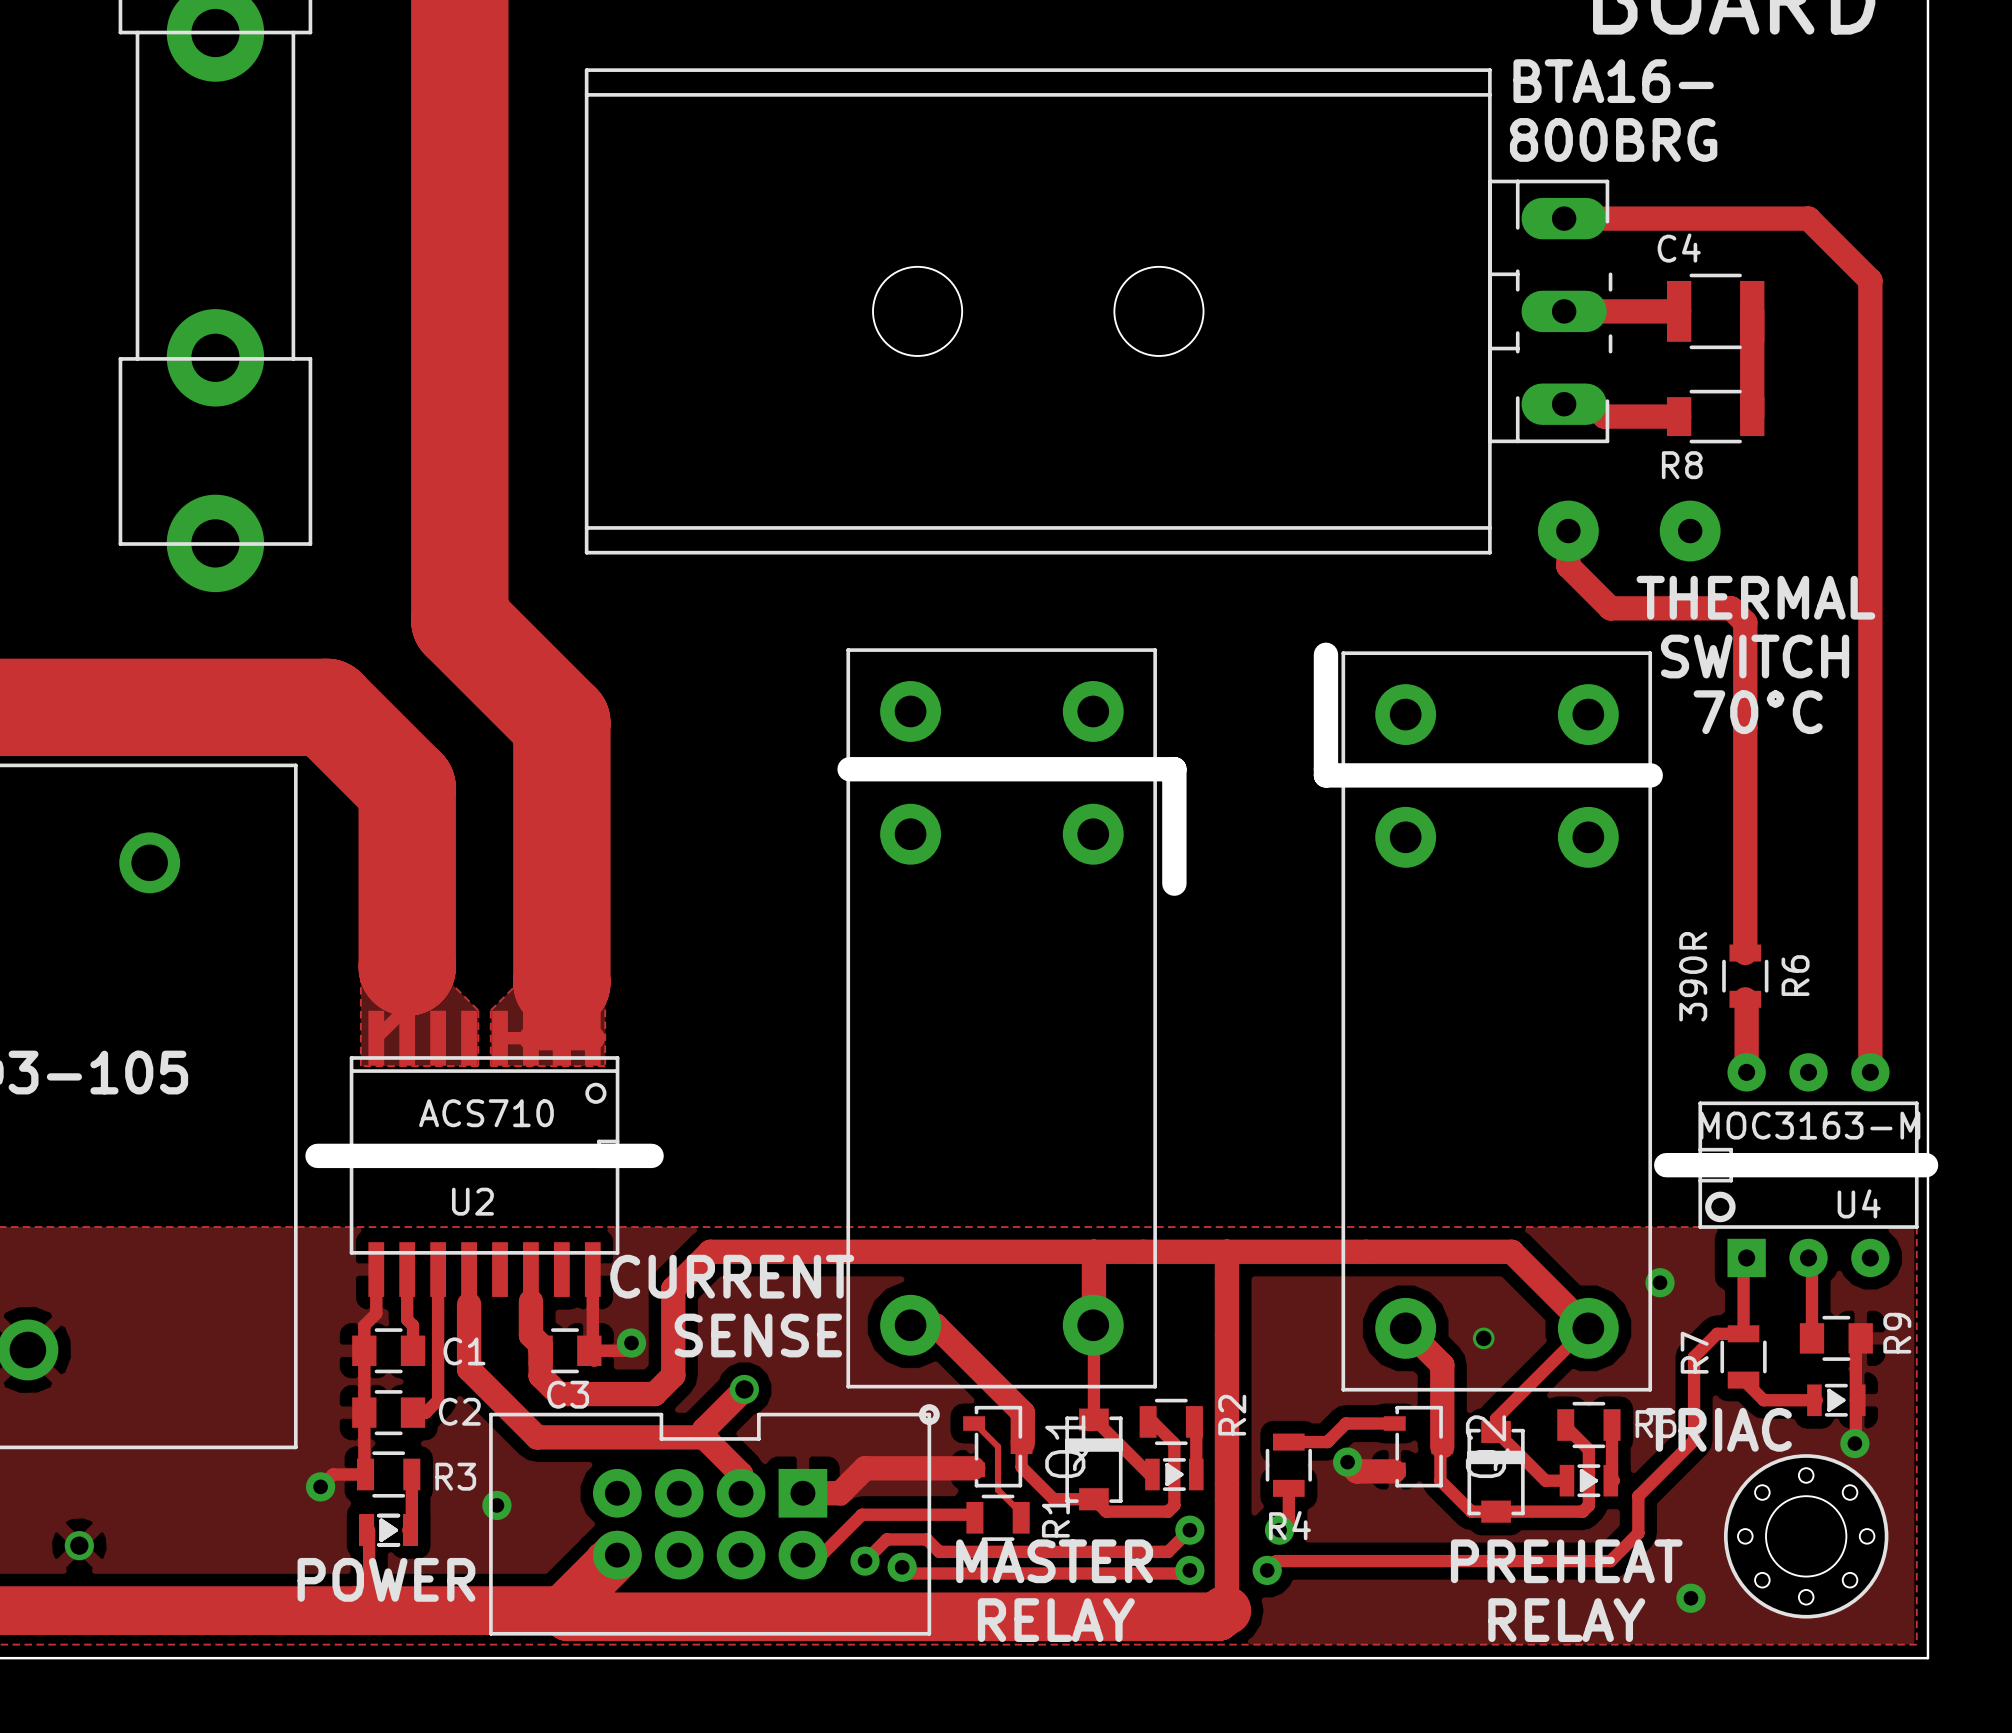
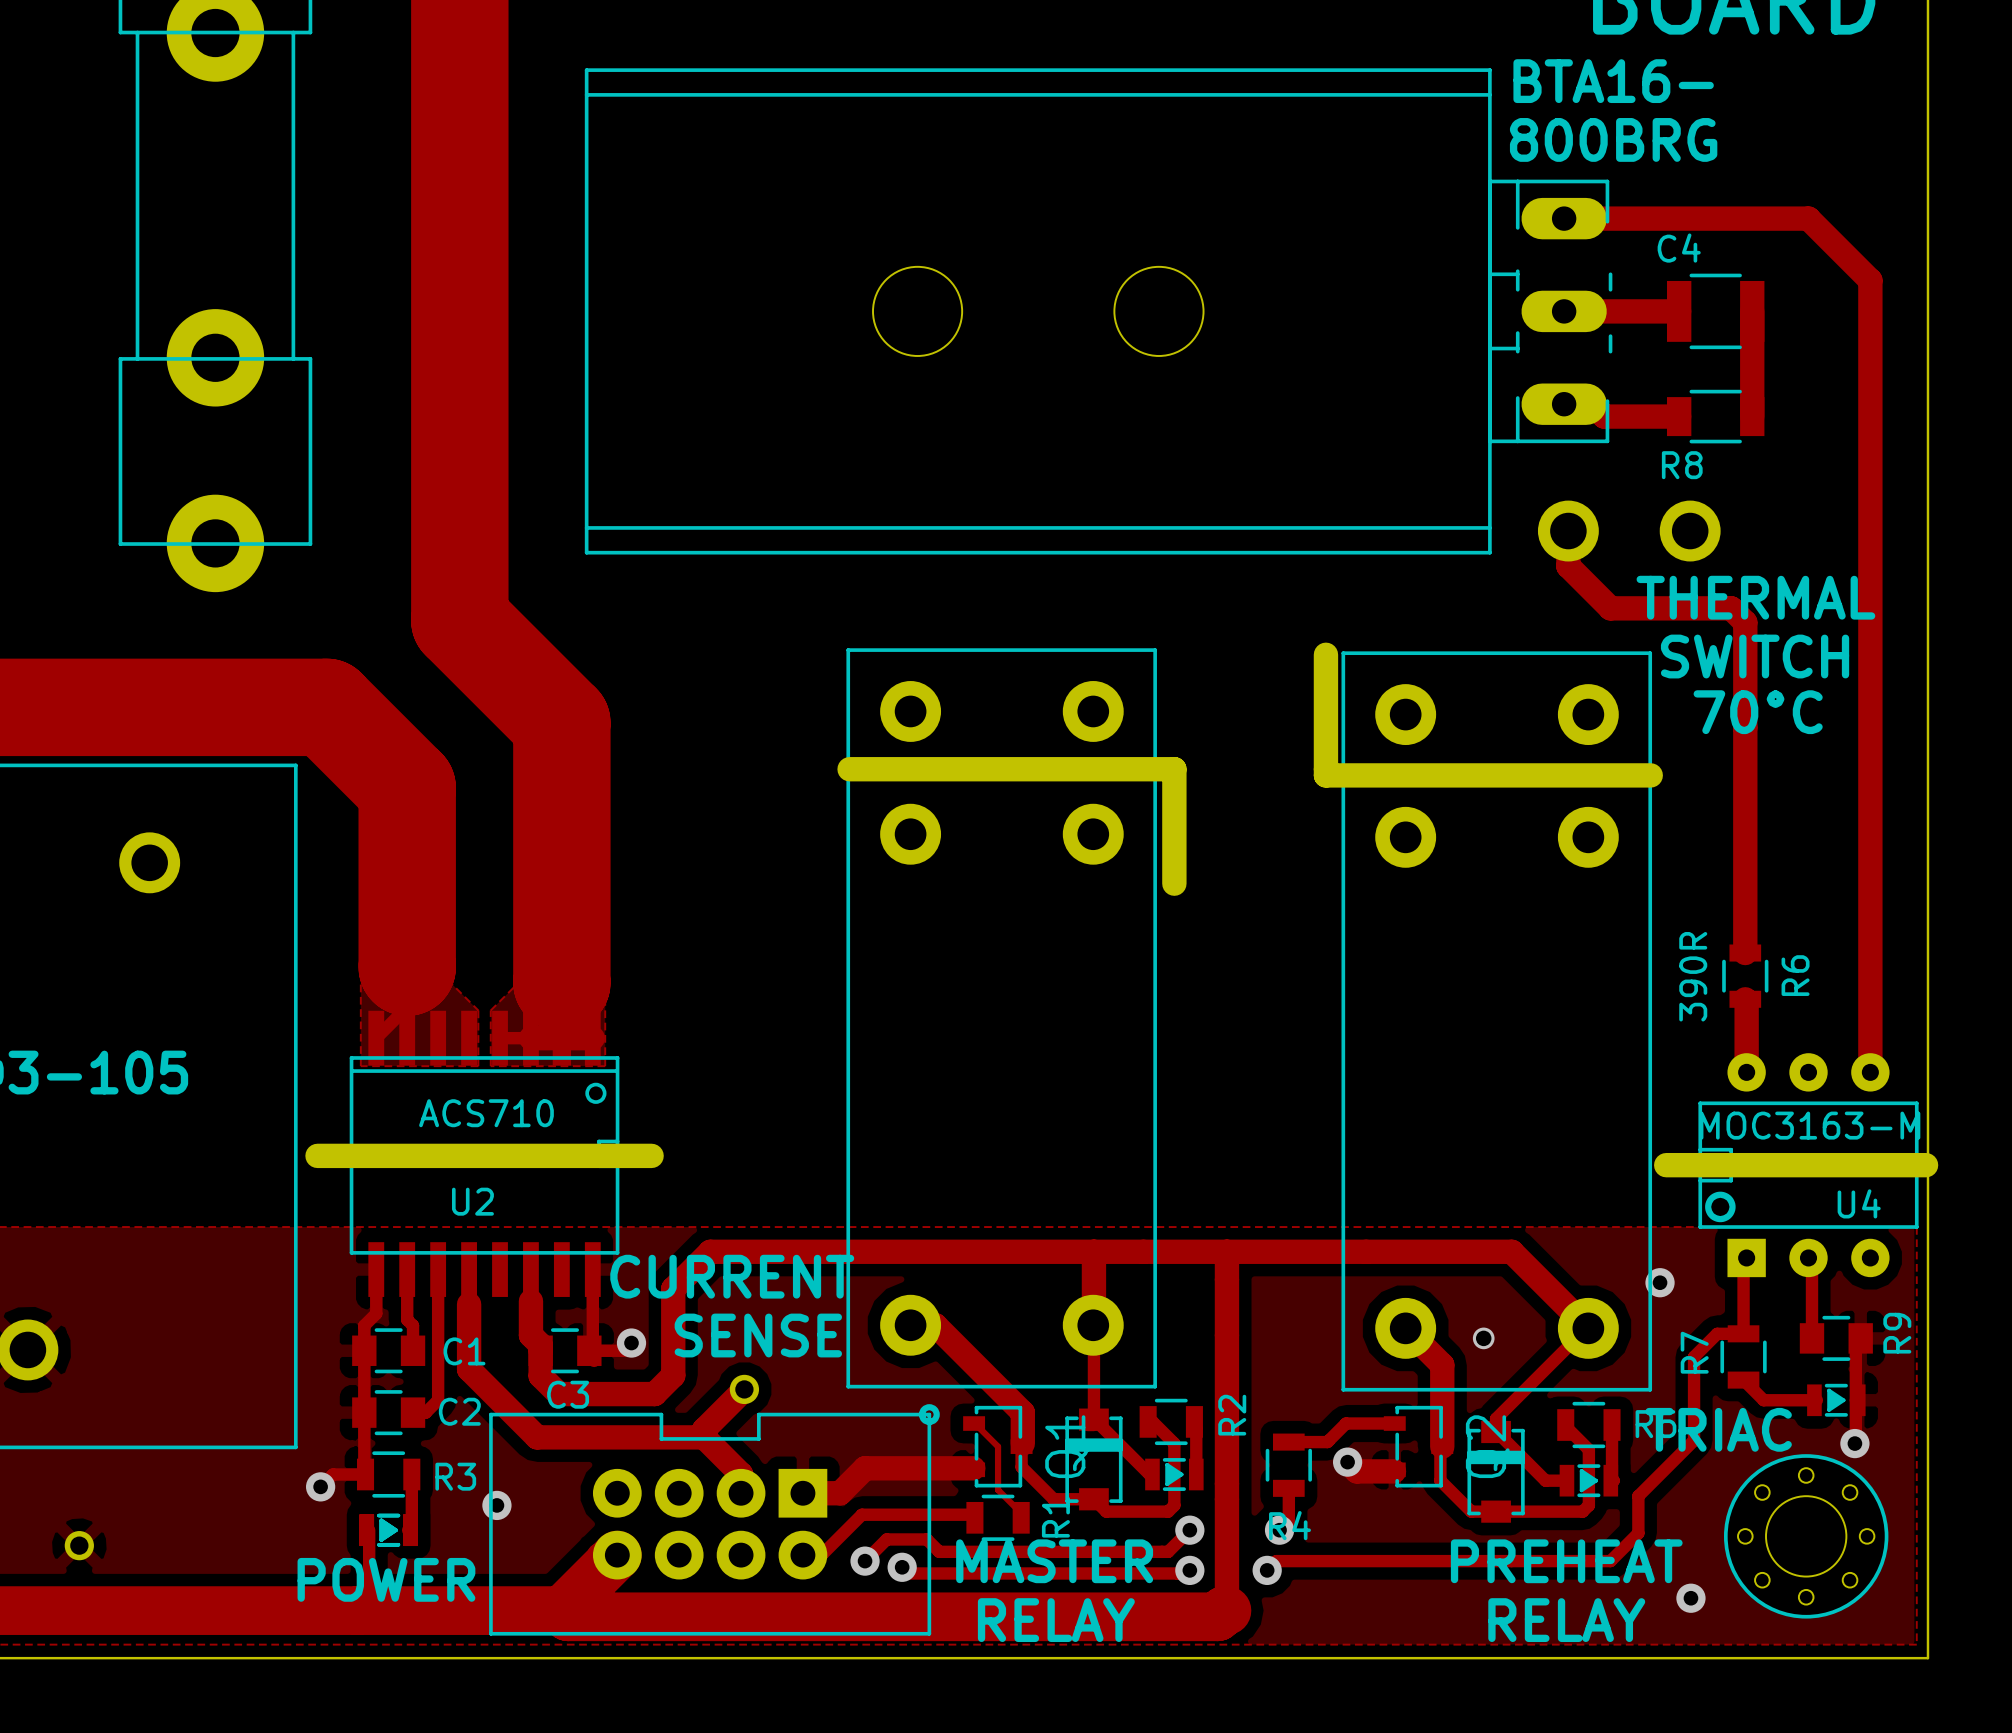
part footprint: [1537, 500, 1721, 562] -> [1537, 500, 1721, 562]

